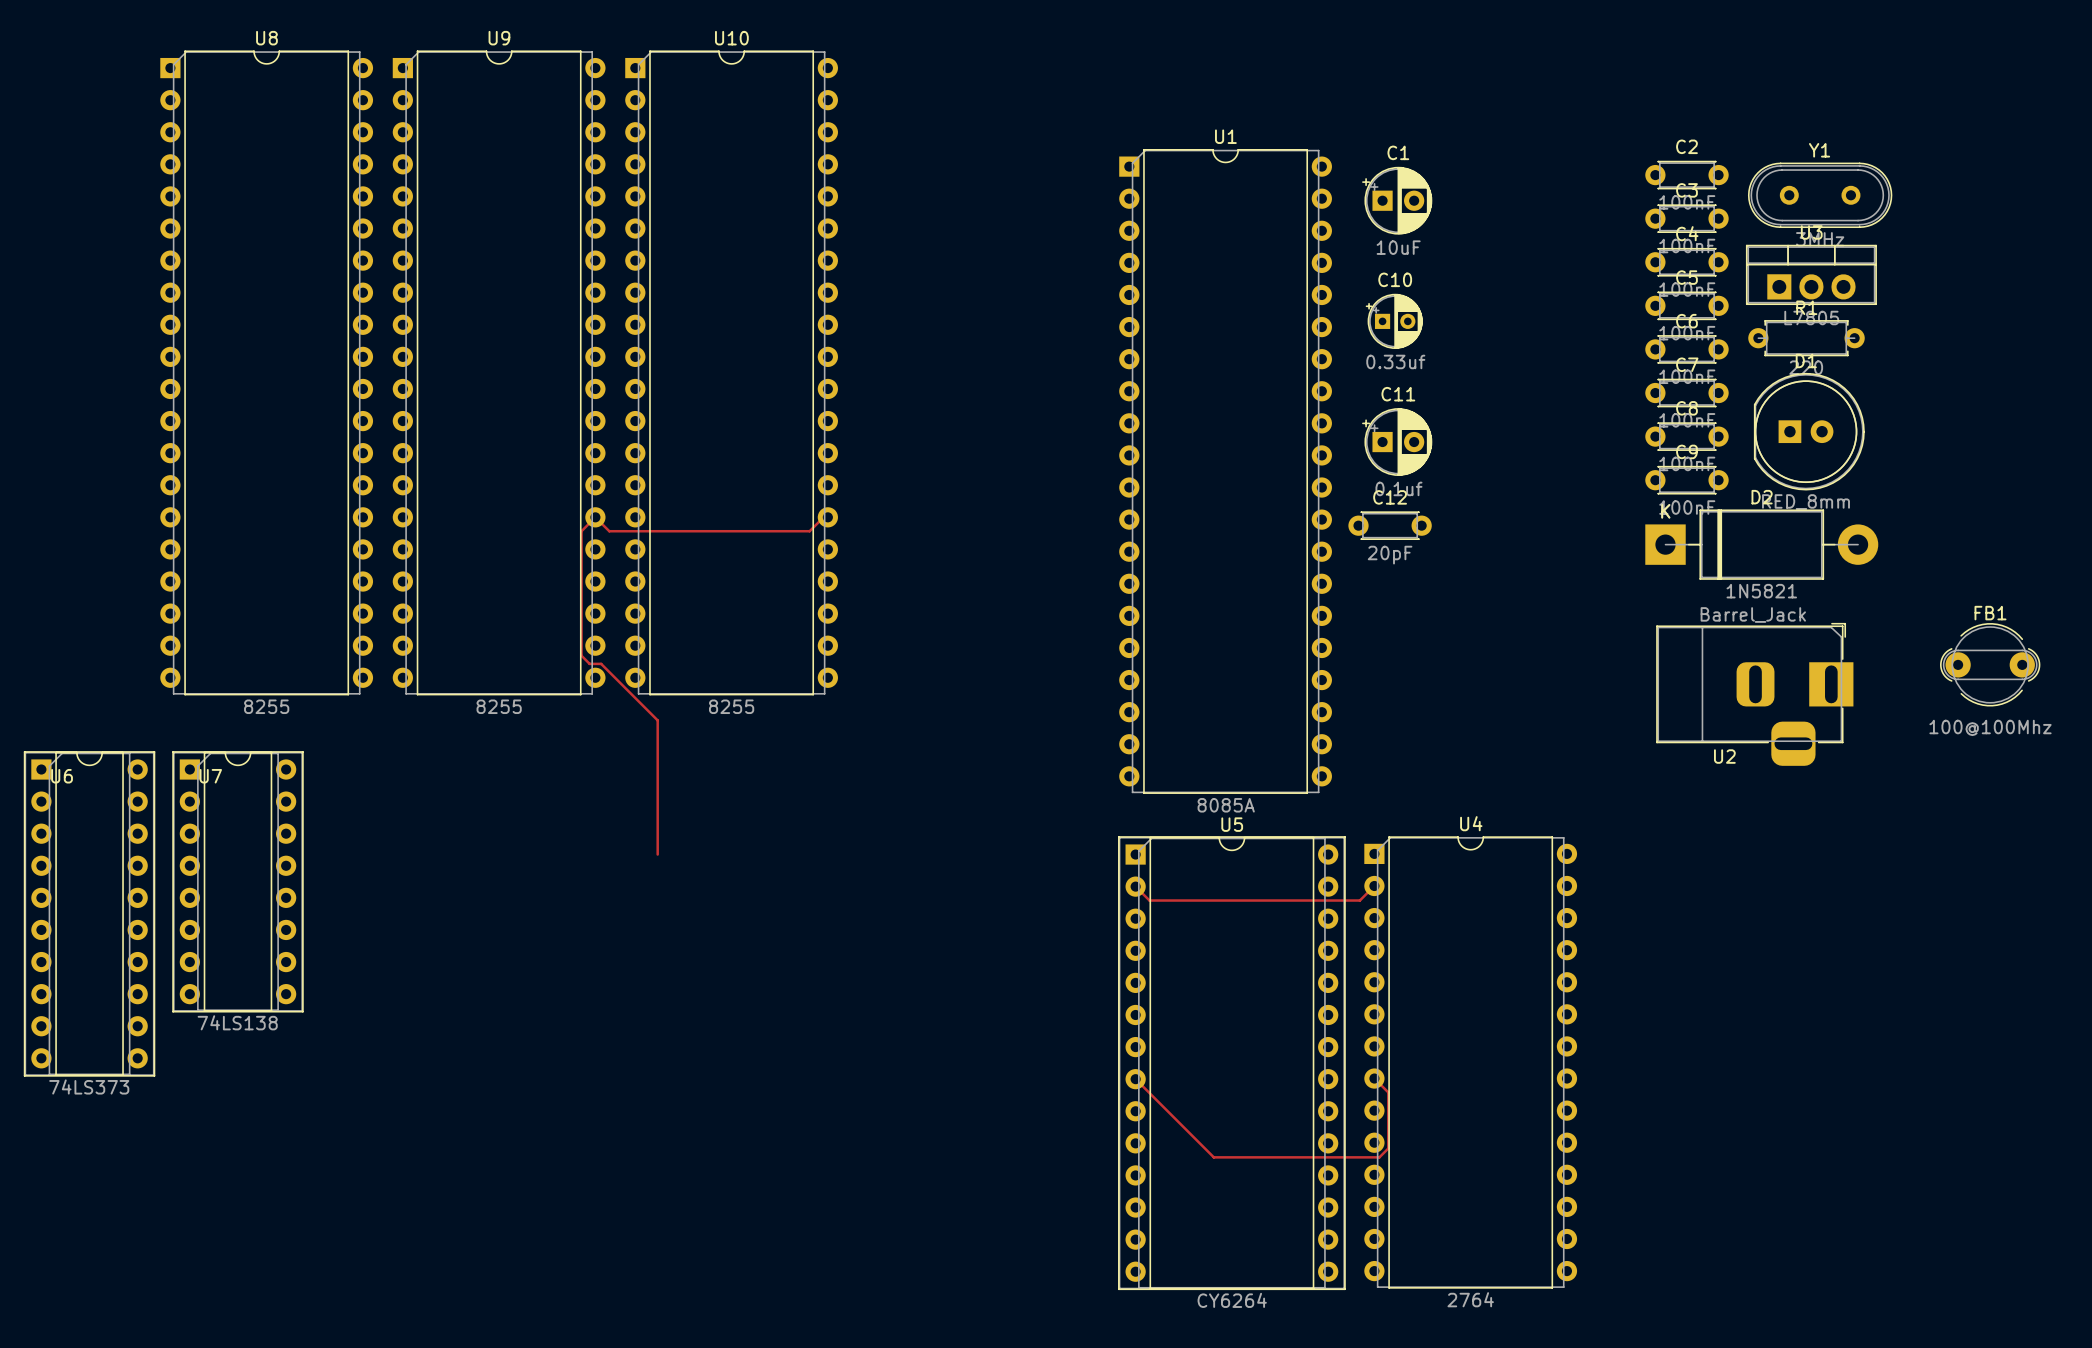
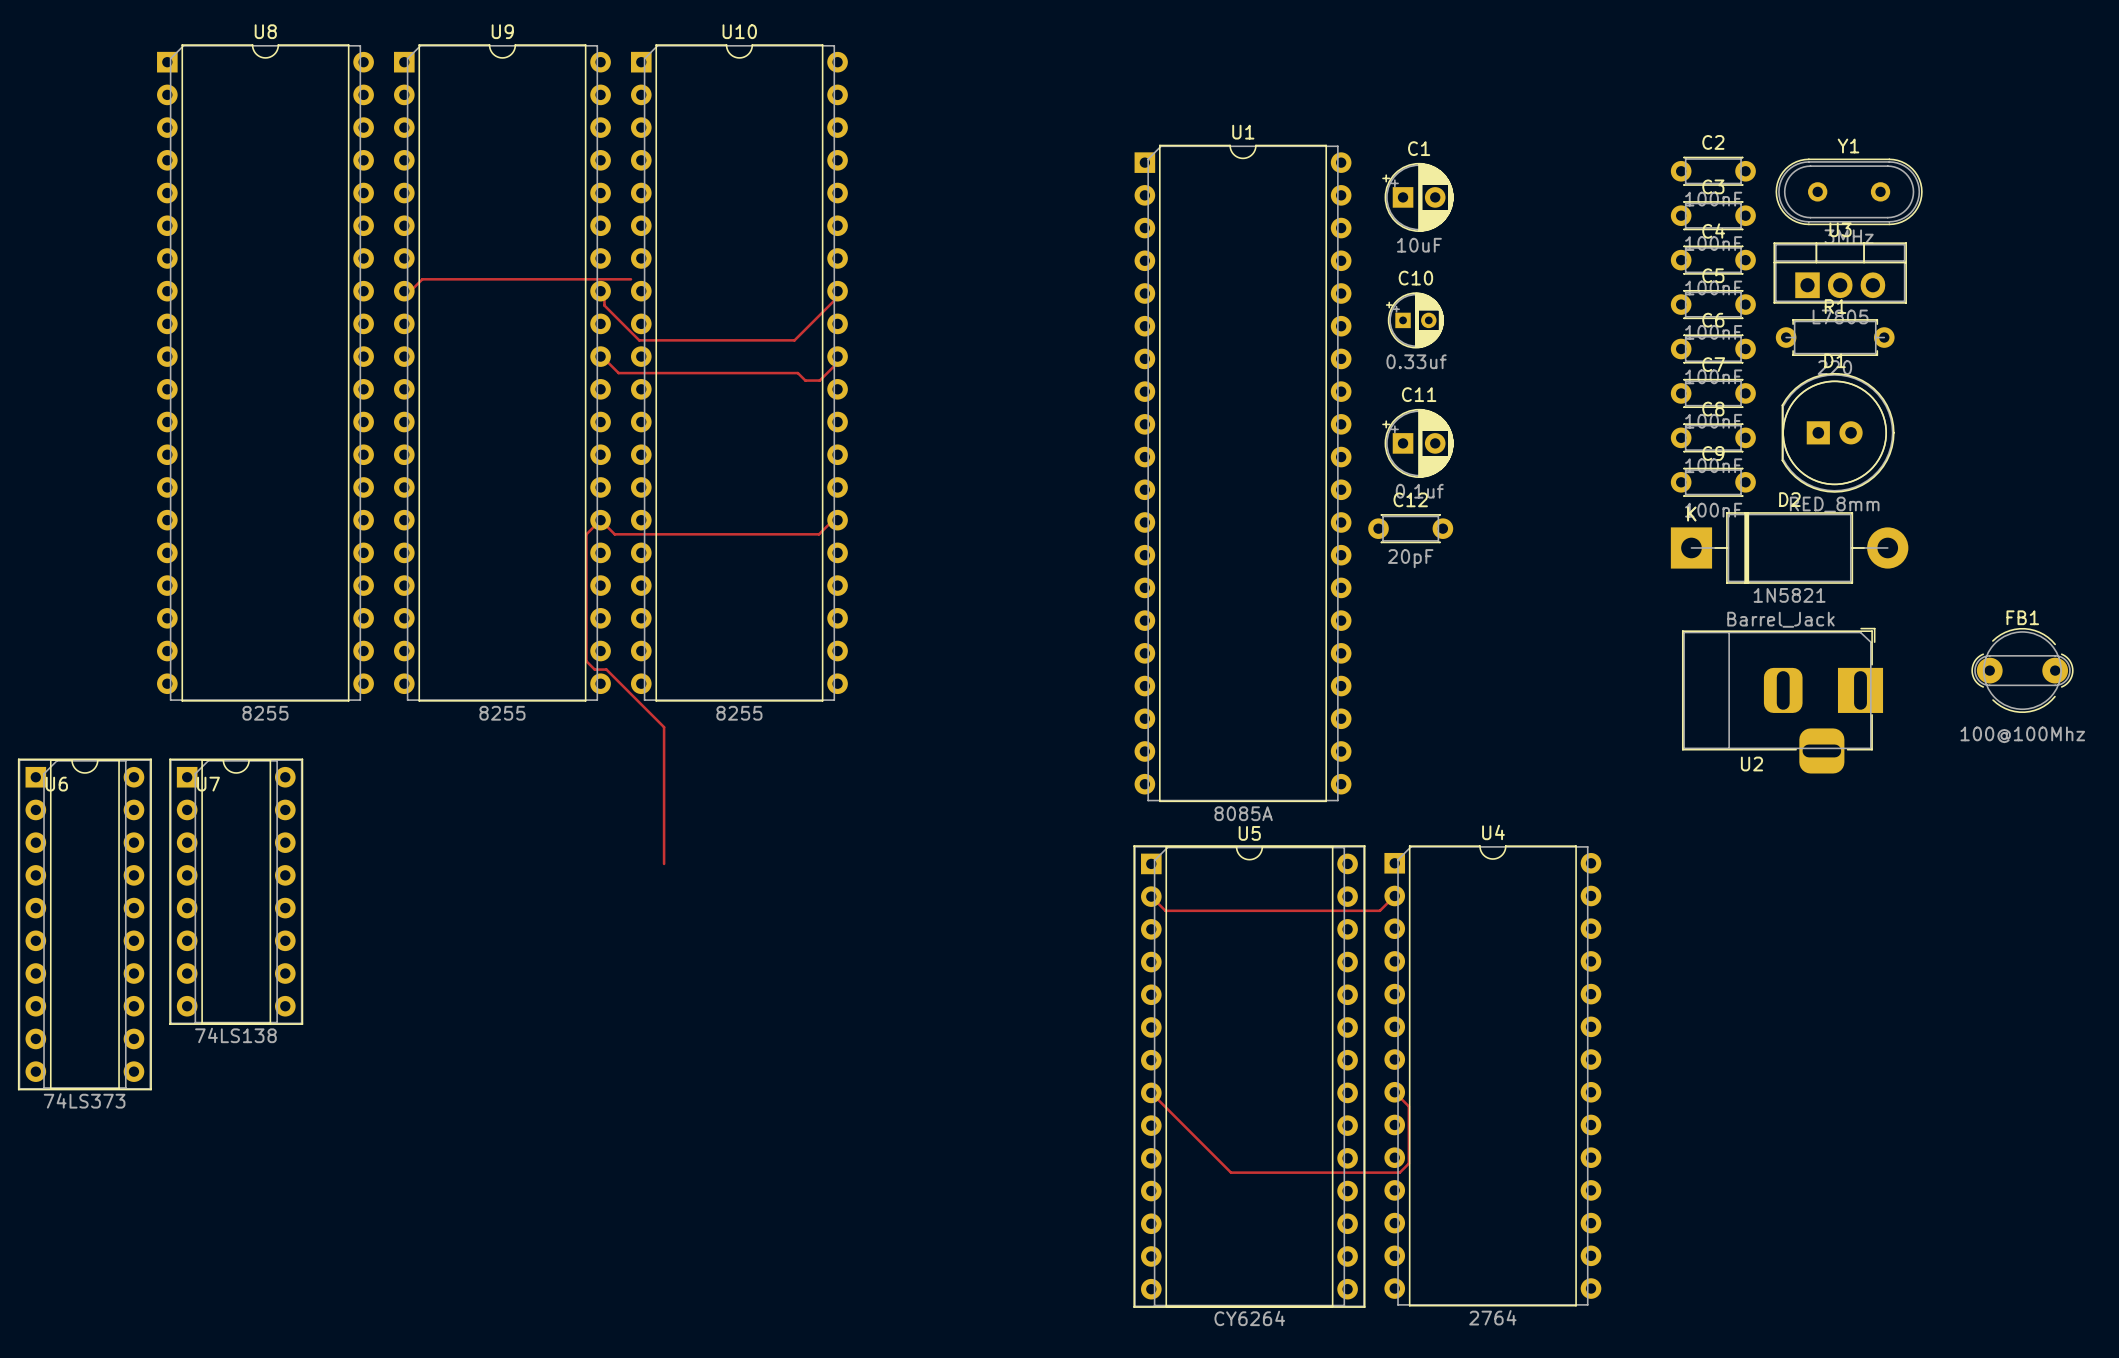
track: none -> (630, 279) (422, 279) (408, 293)
track: none -> (604, 293) (604, 305) (639, 340) (794, 340) (841, 293)
track: none -> (604, 358) (618, 373) (797, 373) (805, 380) (819, 380) (841, 358)

